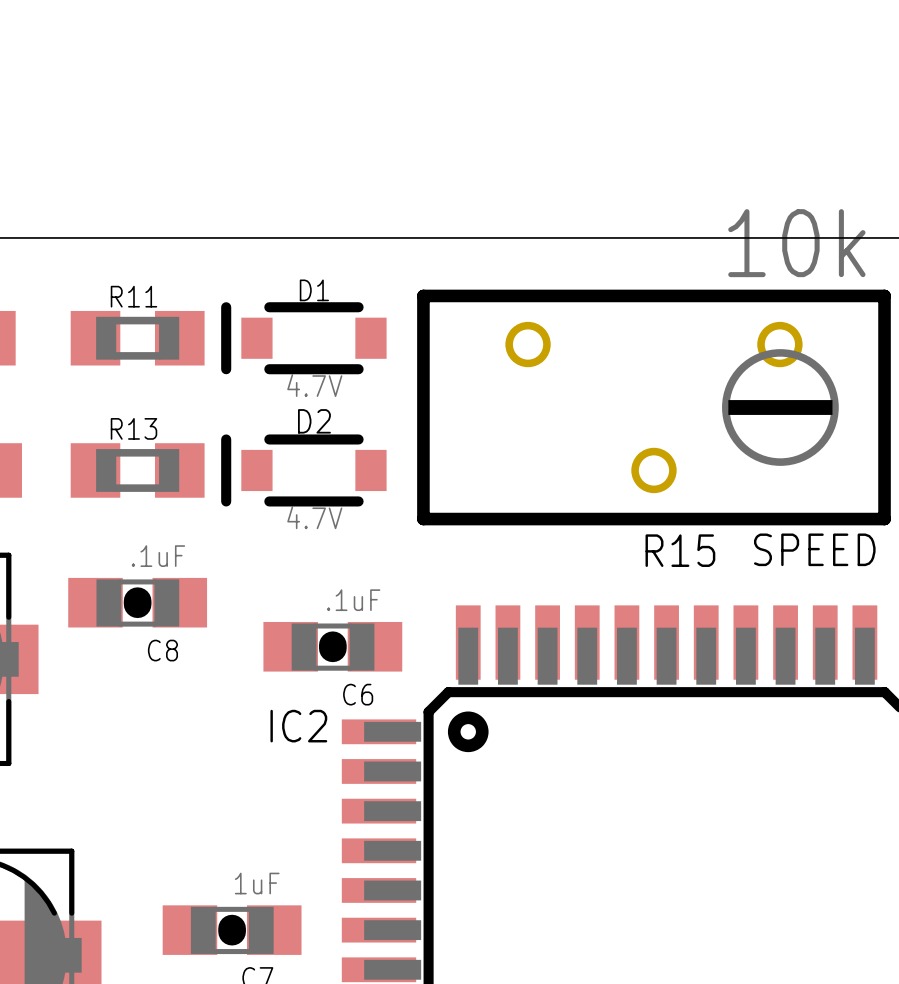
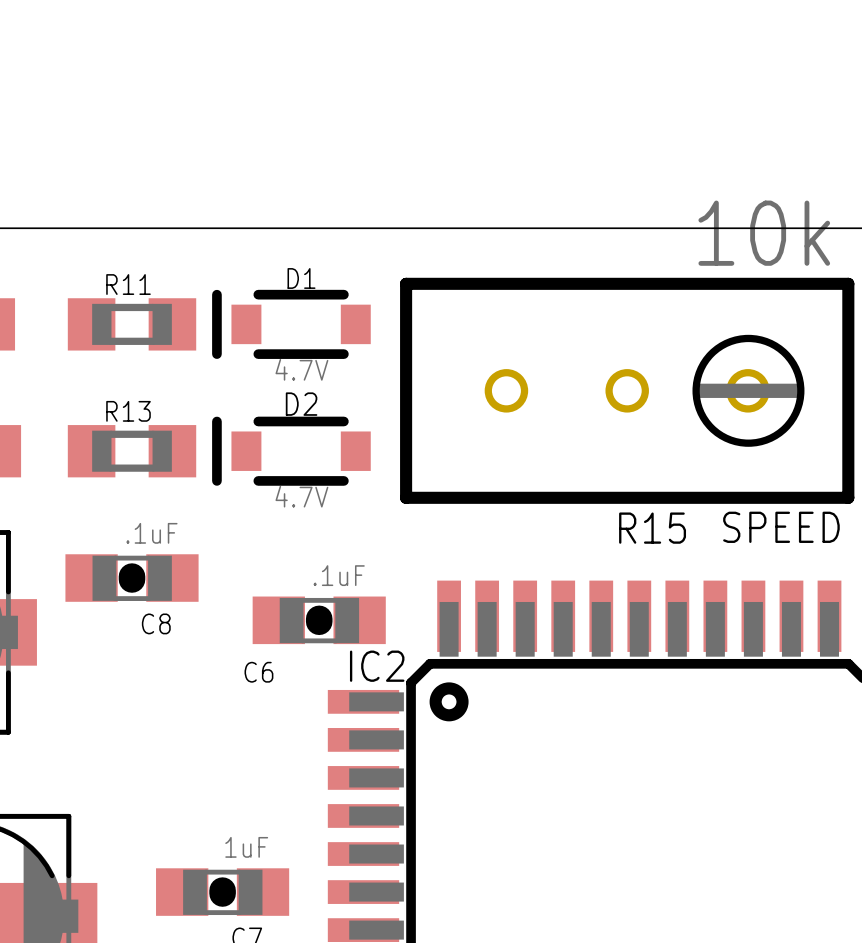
R15 footprint: [417, 289, 891, 526] -> [400, 277, 855, 504]
C6 name position: C6 (358, 694) -> C6 (258, 672)
IC2 name position: IC2 (298, 726) -> IC2 (377, 666)

